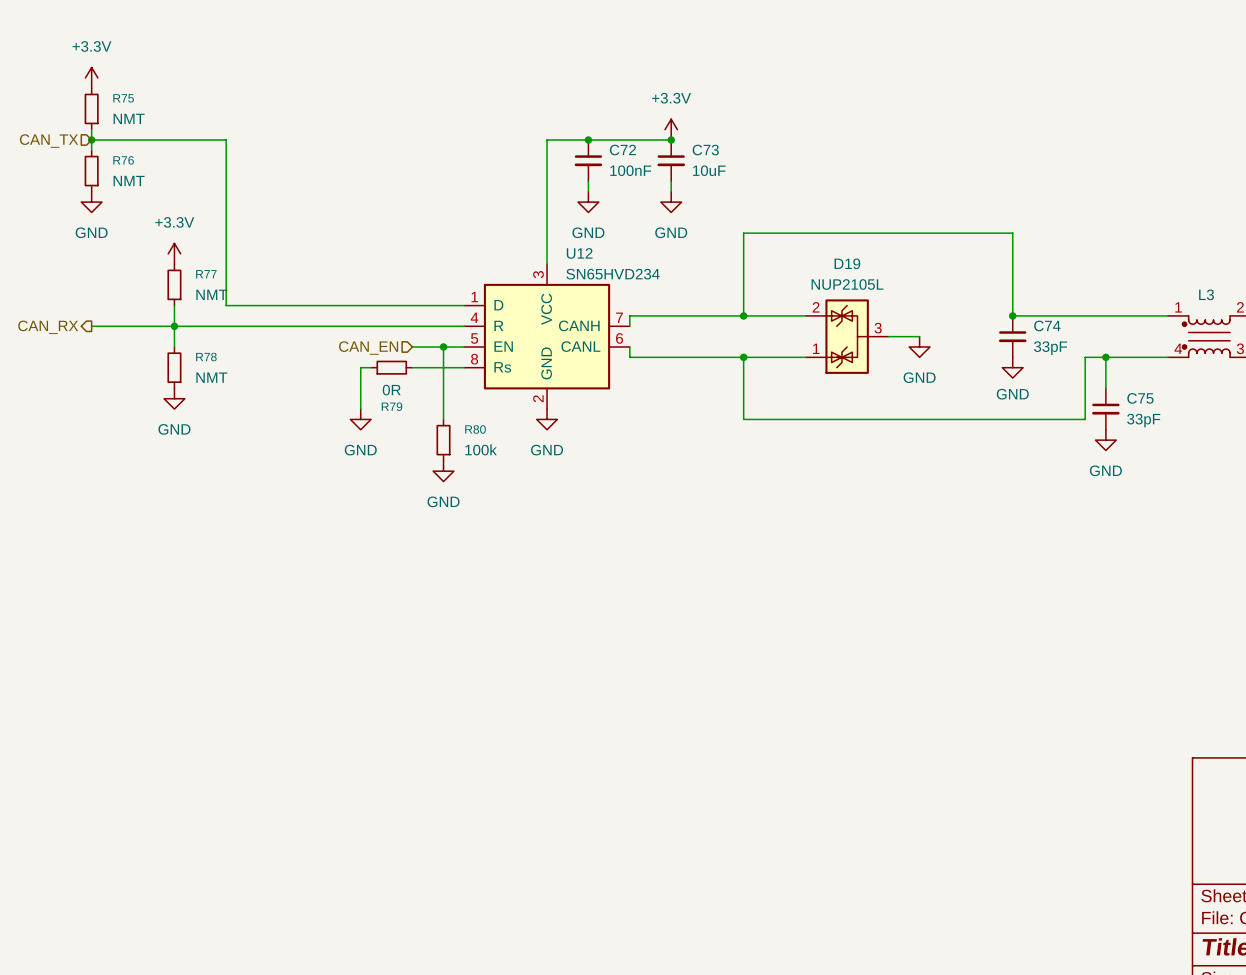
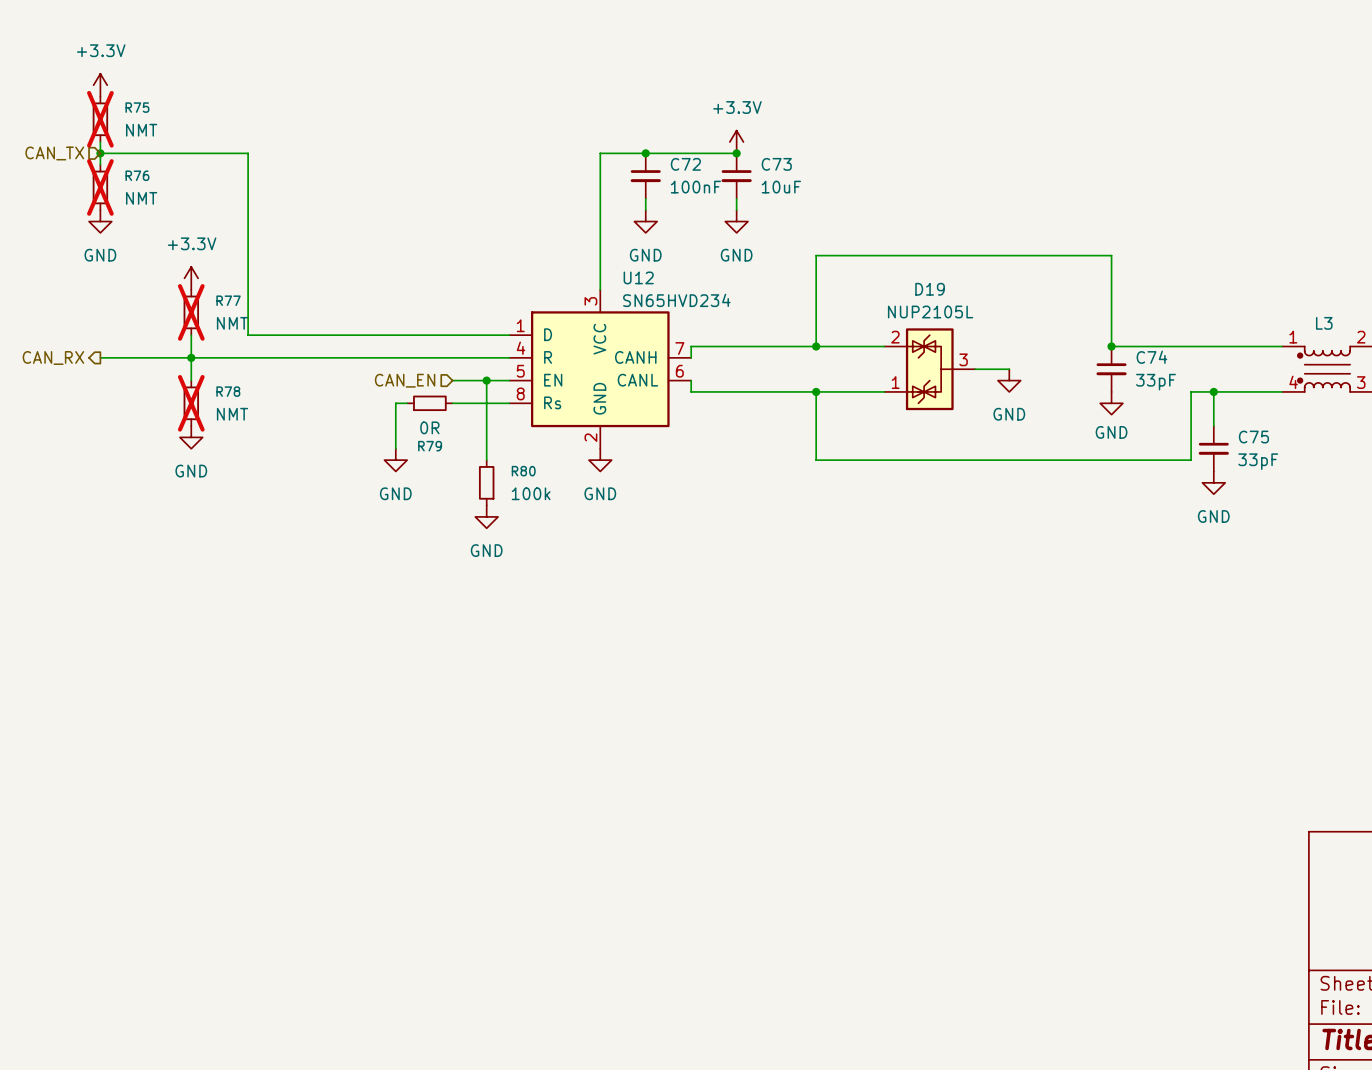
R75 do-not-place cross: none -> (100, 119)
R76 do-not-place cross: none -> (100, 187)
R77 do-not-place cross: none -> (191, 312)
R78 do-not-place cross: none -> (191, 403)

